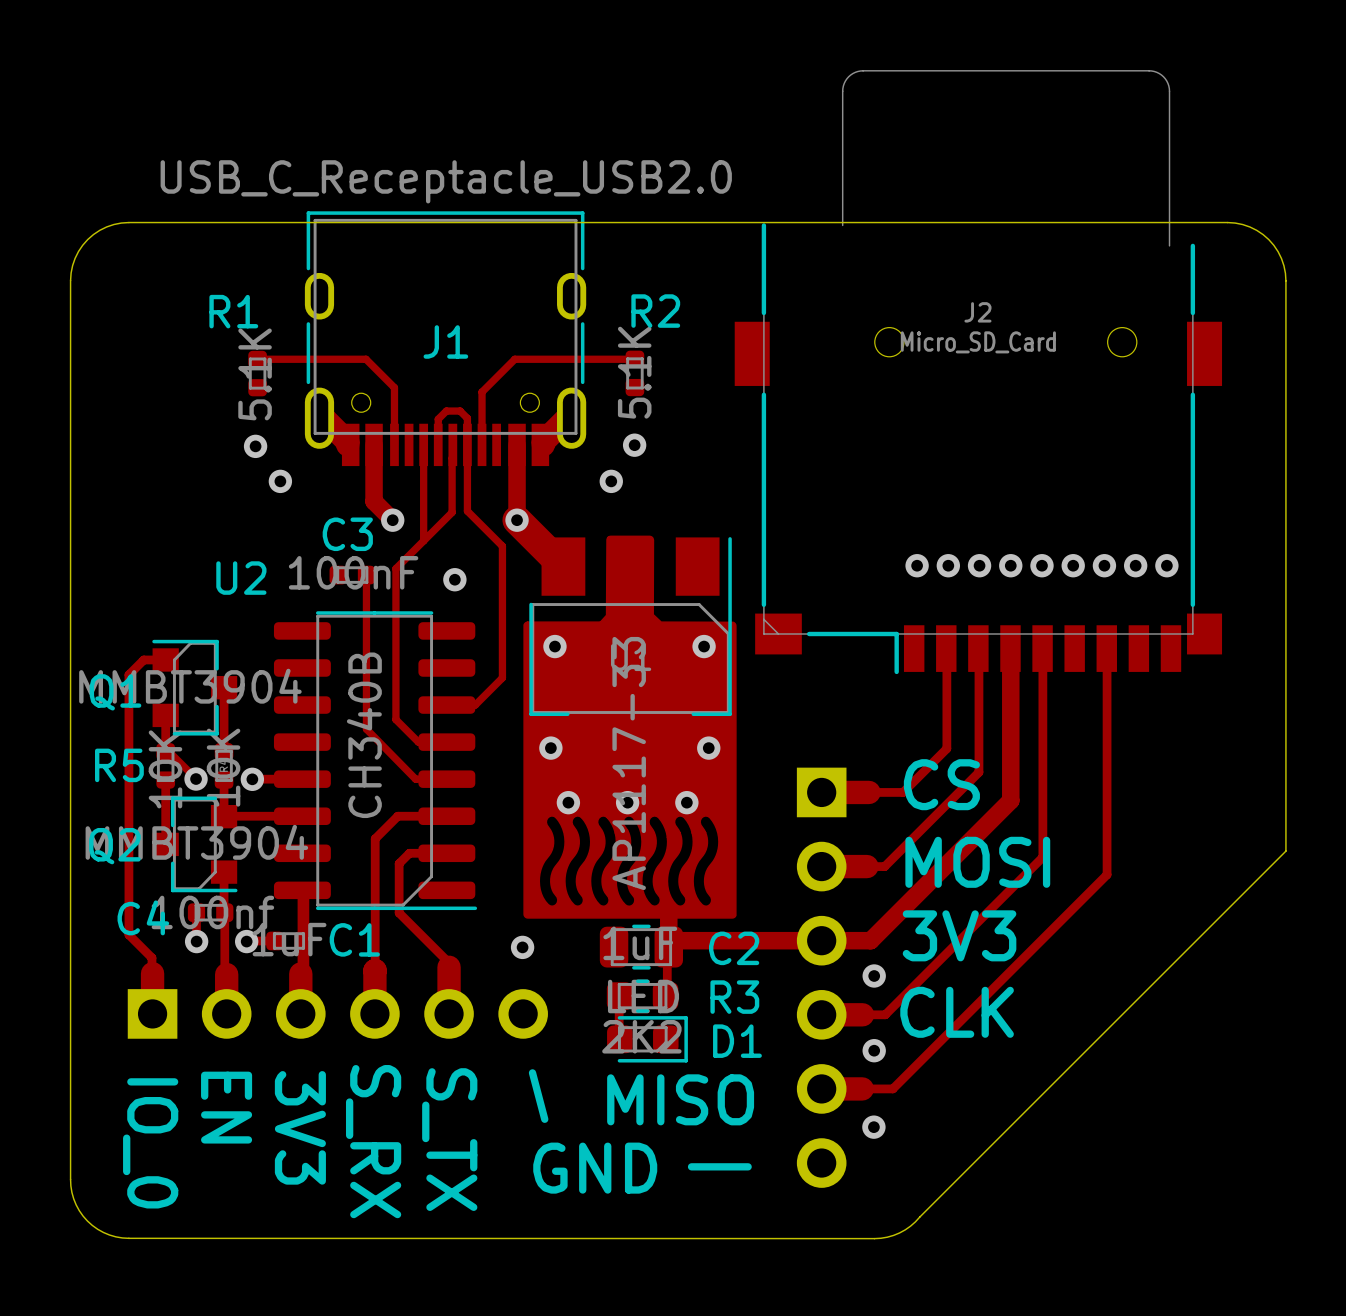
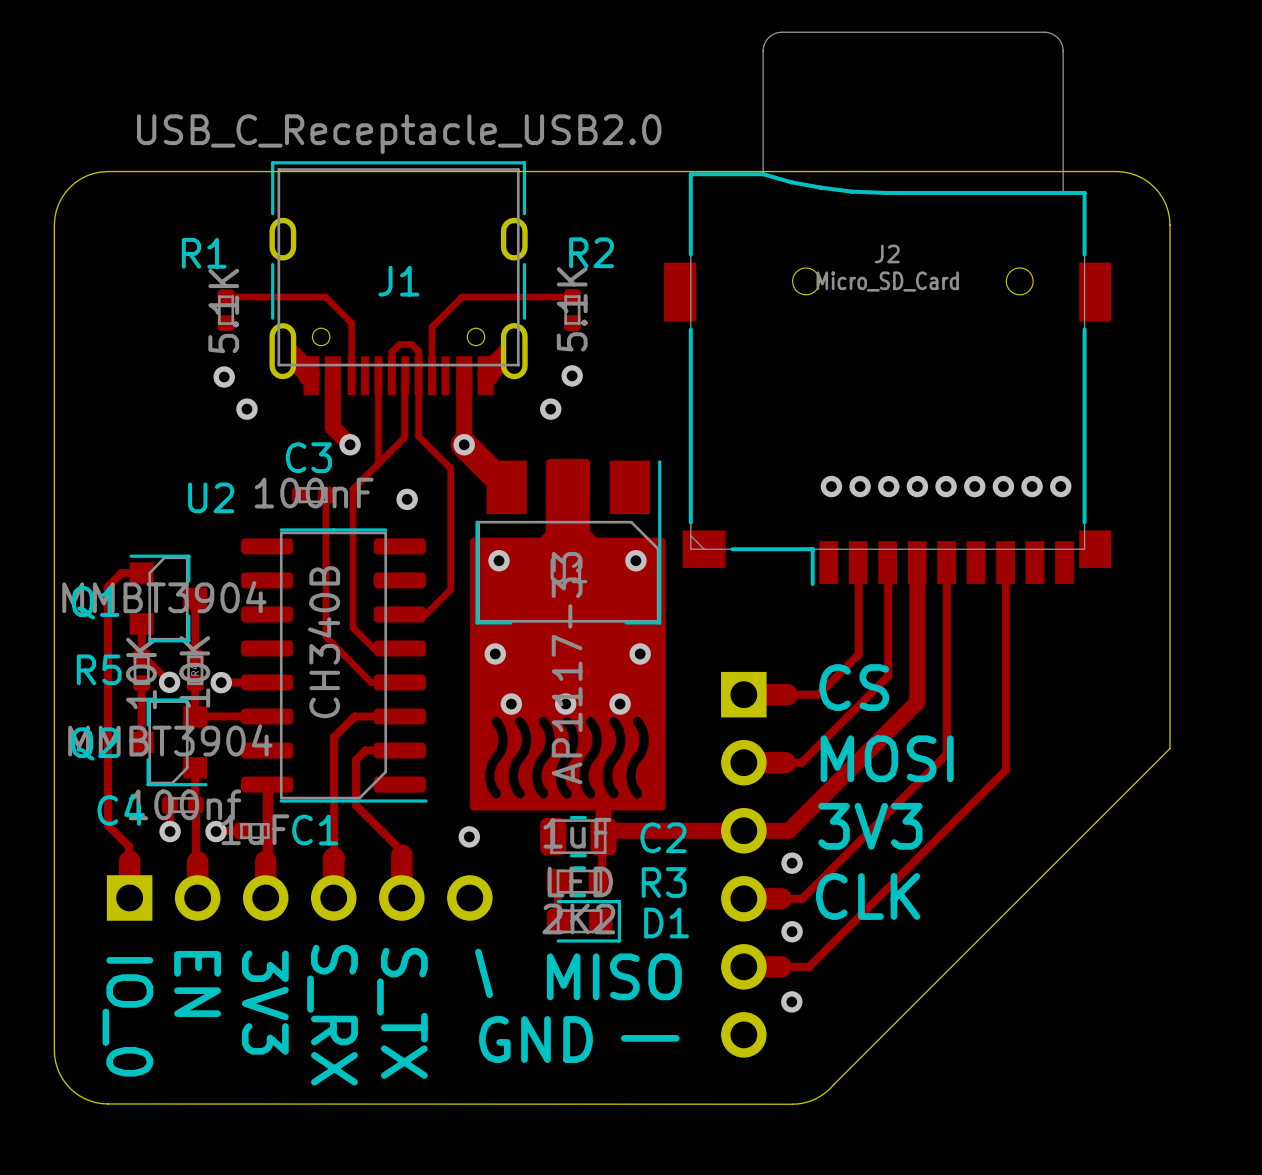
J2 footprint: [734, 70, 1223, 675] -> [664, 31, 1112, 587]

